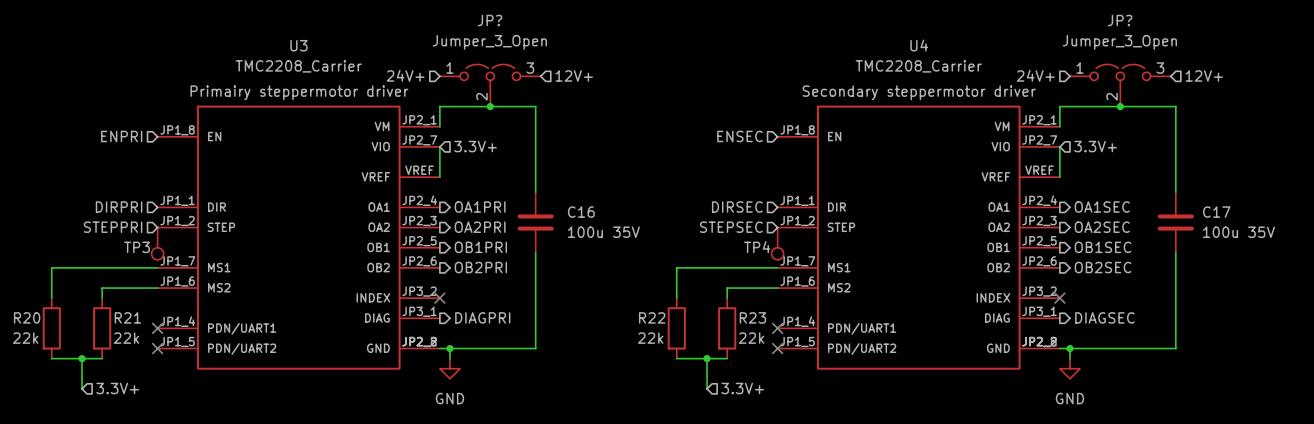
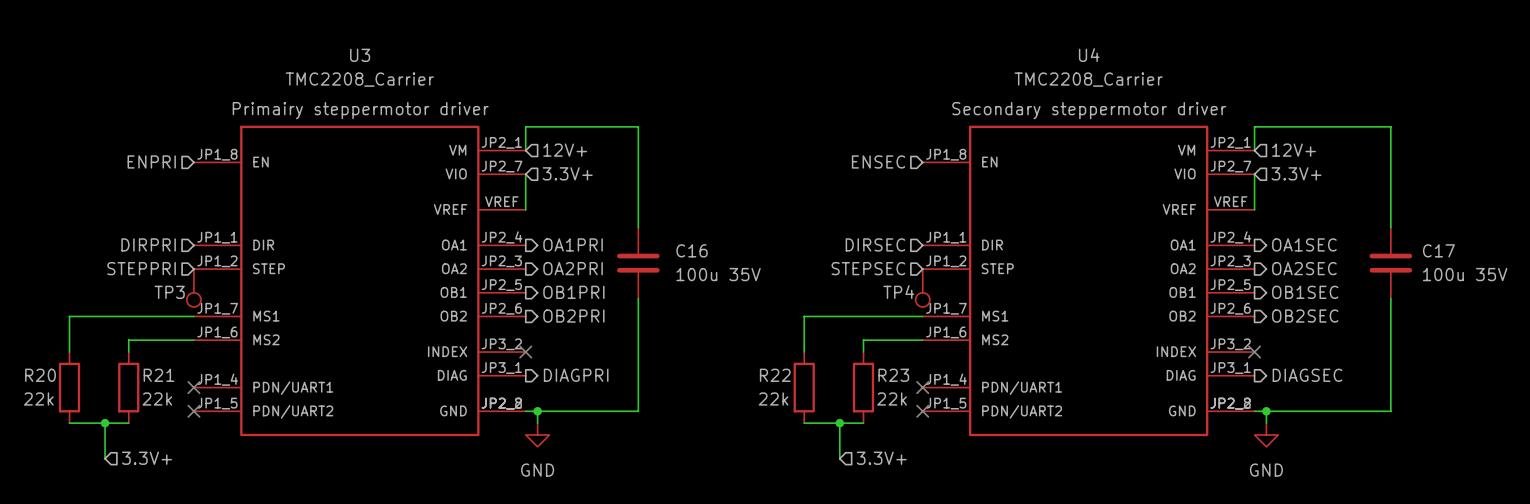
hierarchical label: 24V+ (405, 75) -> none
hierarchical label position: 12V+ (574, 75) -> 12V+ (565, 150)
hierarchical label: 24V+ (1035, 75) -> none
hierarchical label position: 12V+ (1204, 75) -> 12V+ (1293, 150)
JP?: Jumper_3_Open (490, 85) -> none
JP?: Jumper_3_Open (1120, 85) -> none
junction: (490, 106) -> none
junction: (1120, 106) -> none

